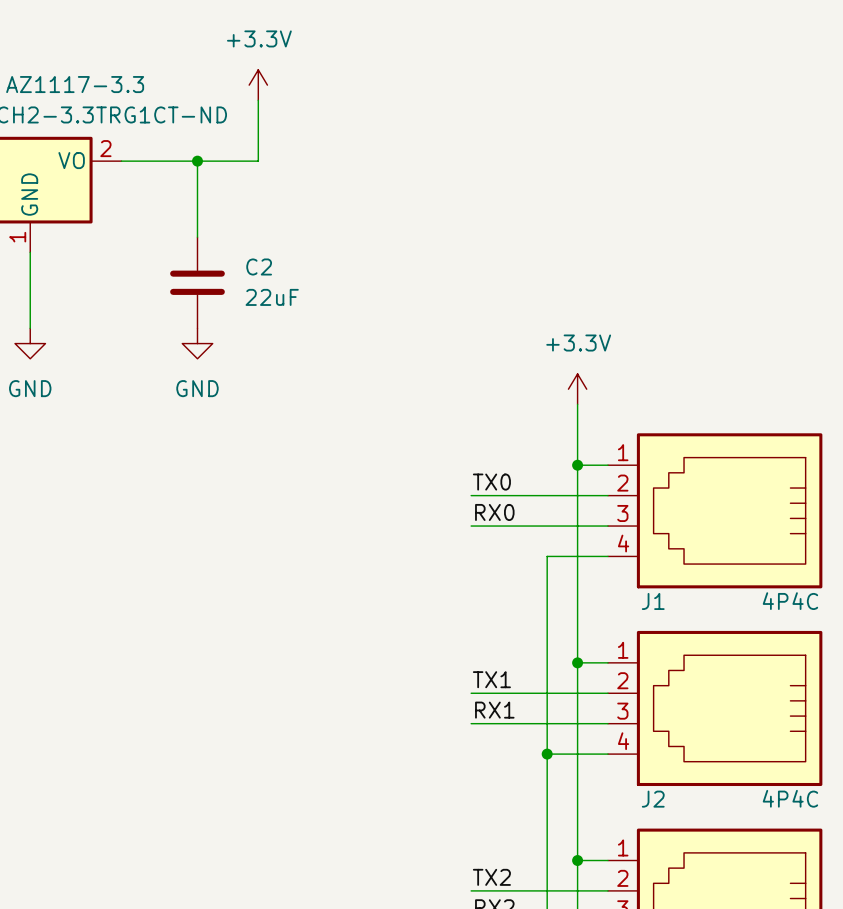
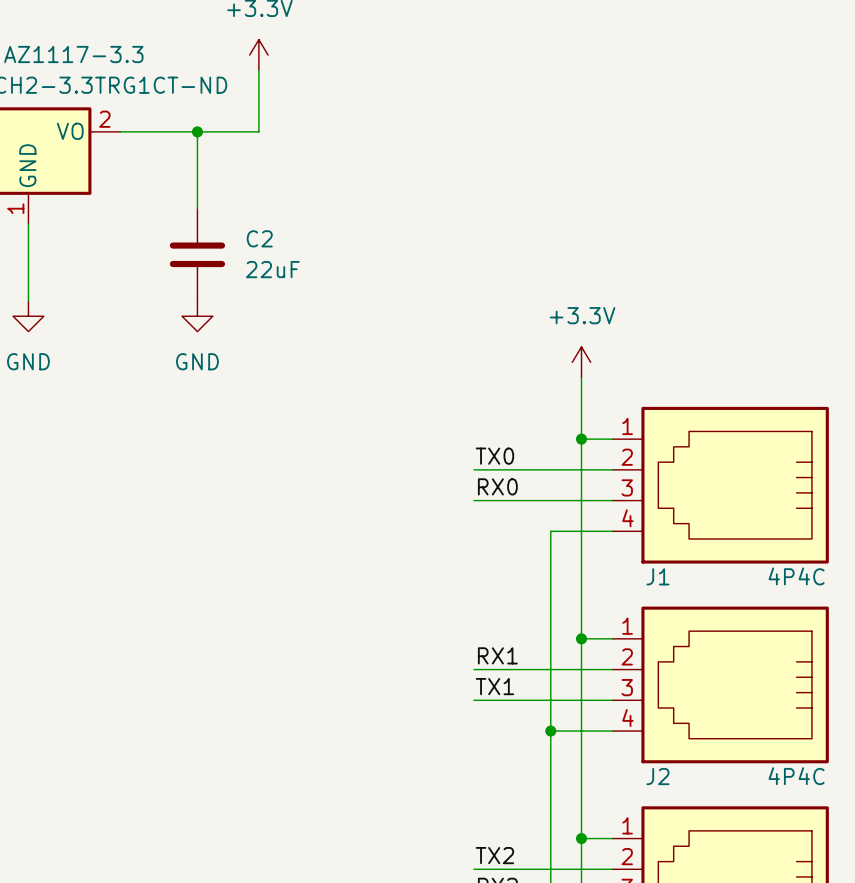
label: TX1 (491, 679) -> RX1 (497, 655)
label: RX1 (494, 710) -> TX1 (494, 686)

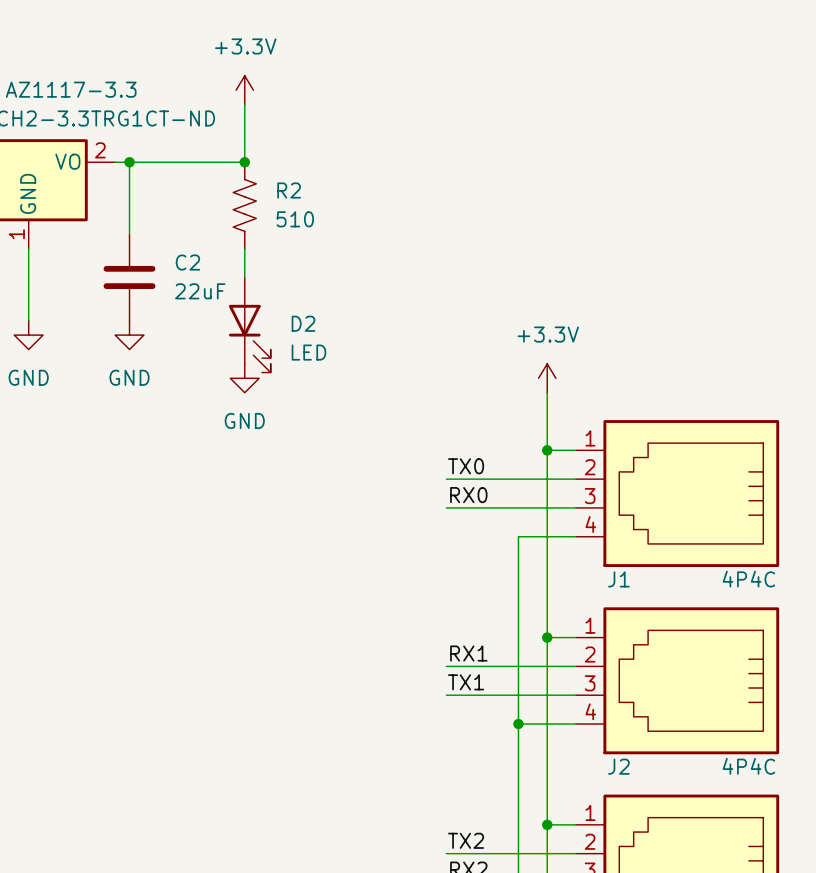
junction: none -> (129, 162)
wire: (197, 131) (197, 208) -> (129, 162) (129, 234)
junction: (197, 131) -> none
junction: none -> (244, 162)
R2: none -> 510 (244, 205)
wire: none -> (244, 248) (244, 277)
C2 position: (197, 254) -> (129, 277)
D2: none -> LED (249, 325)
power symbol: none -> GND (129, 335)
power symbol: GND (197, 316) -> none
power symbol: none -> GND (244, 378)

